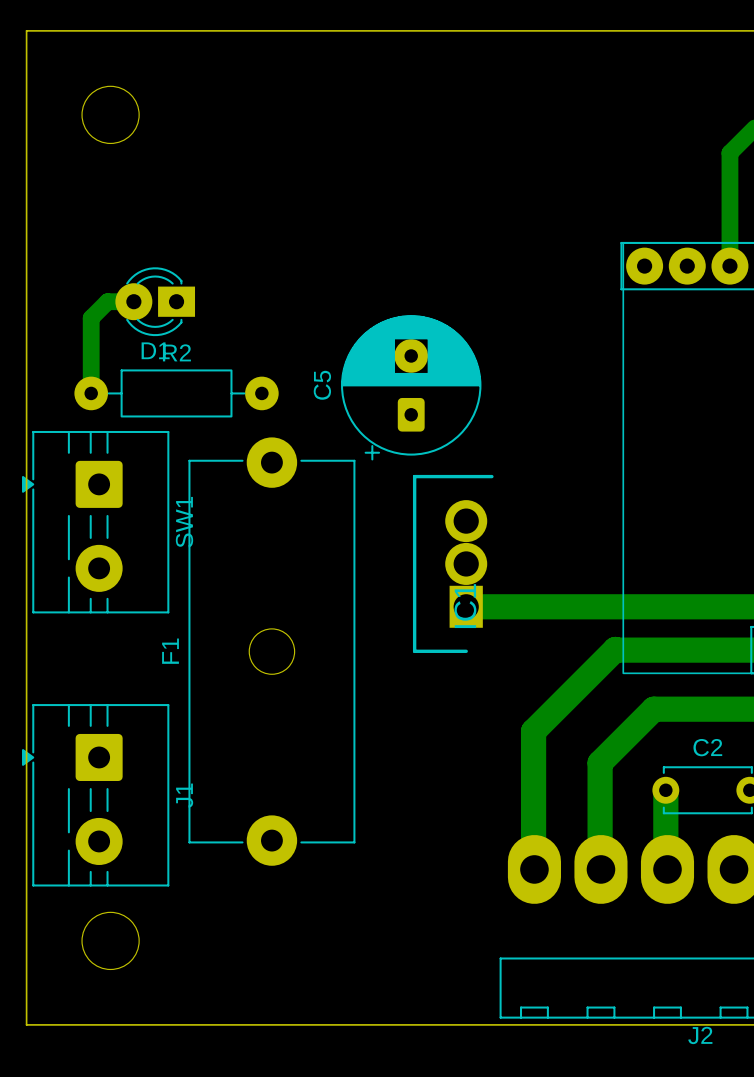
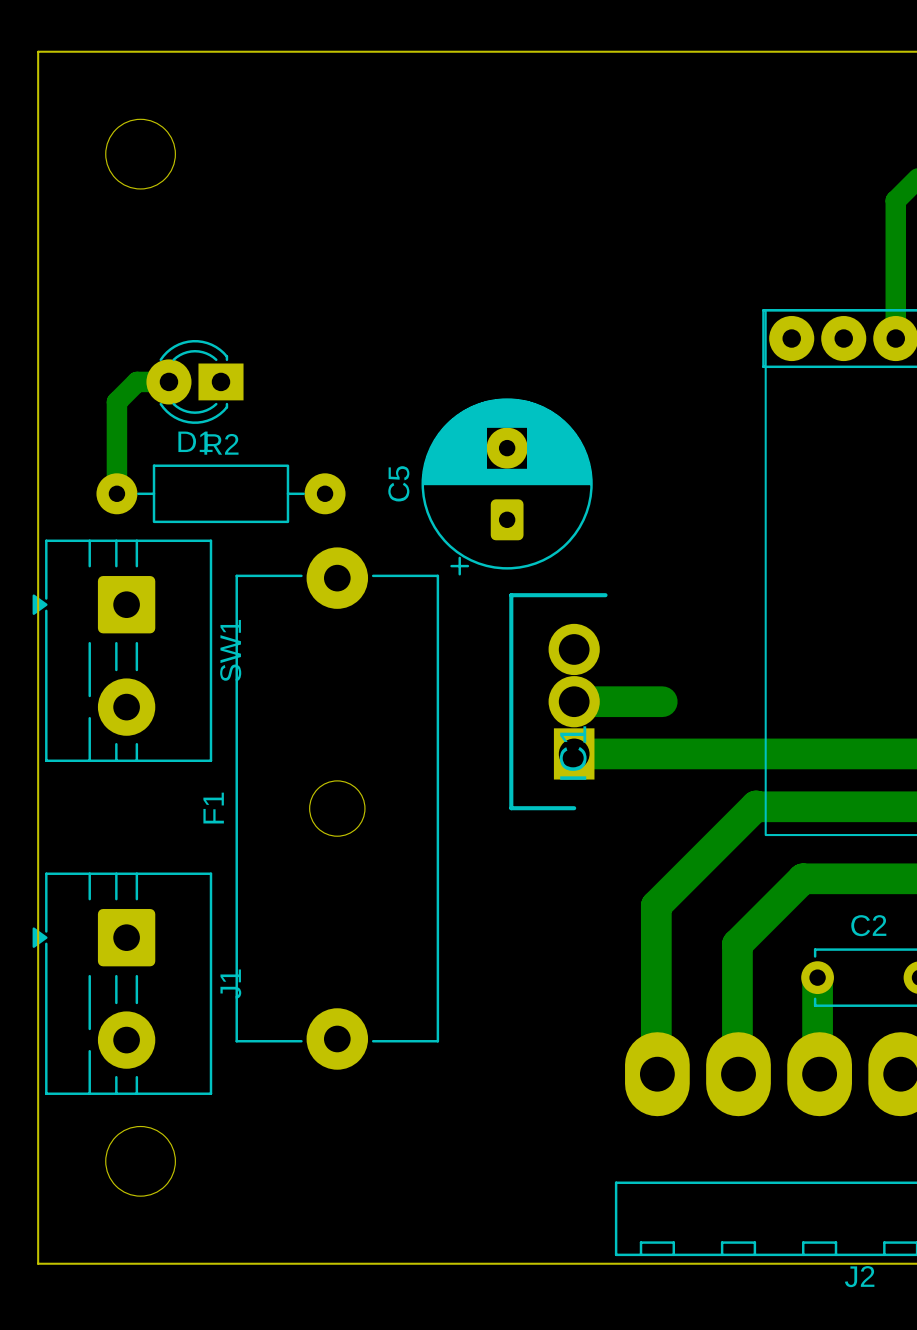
bottom track: none -> (574, 701) (662, 701)

